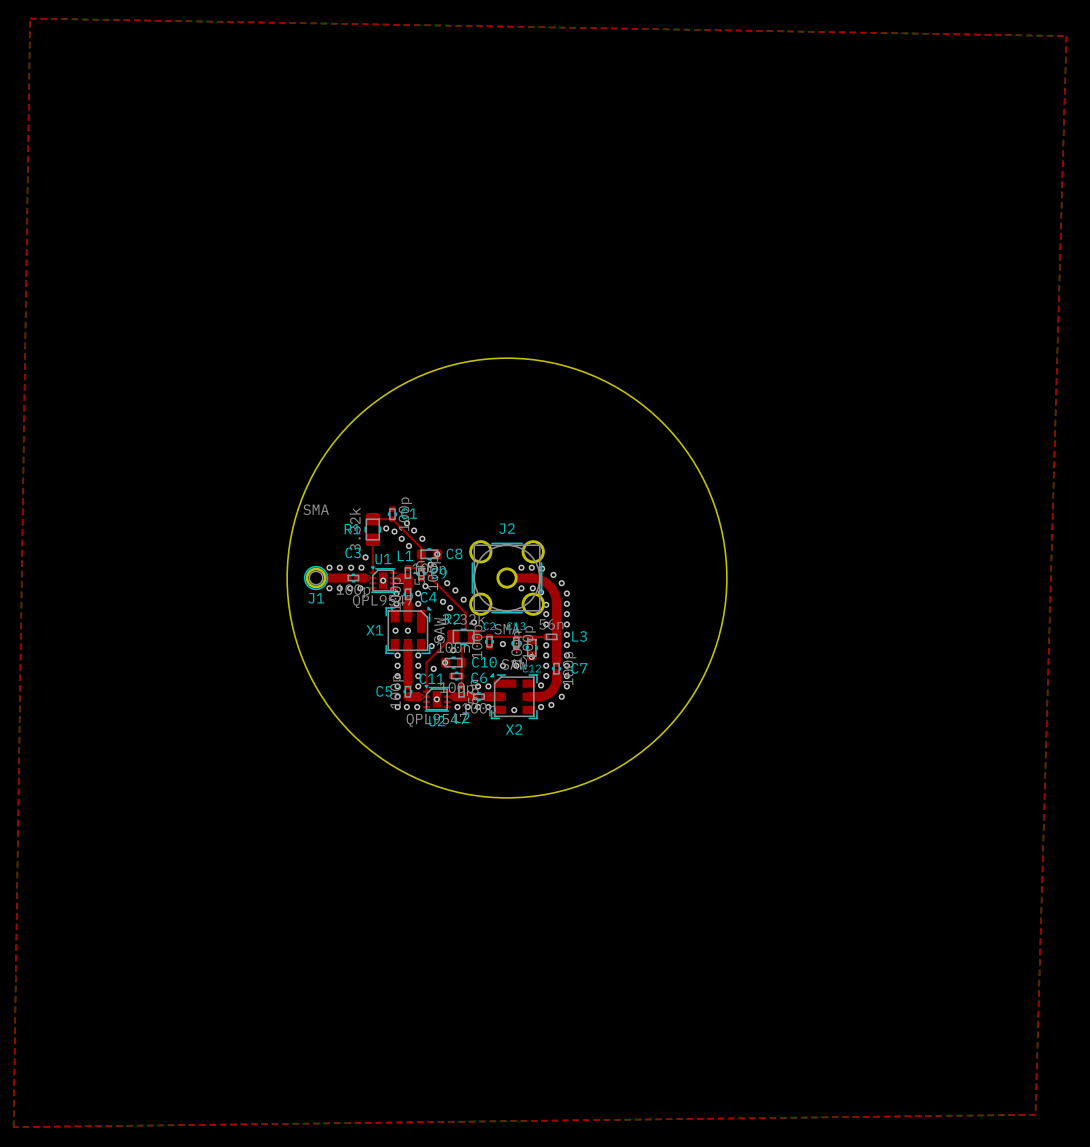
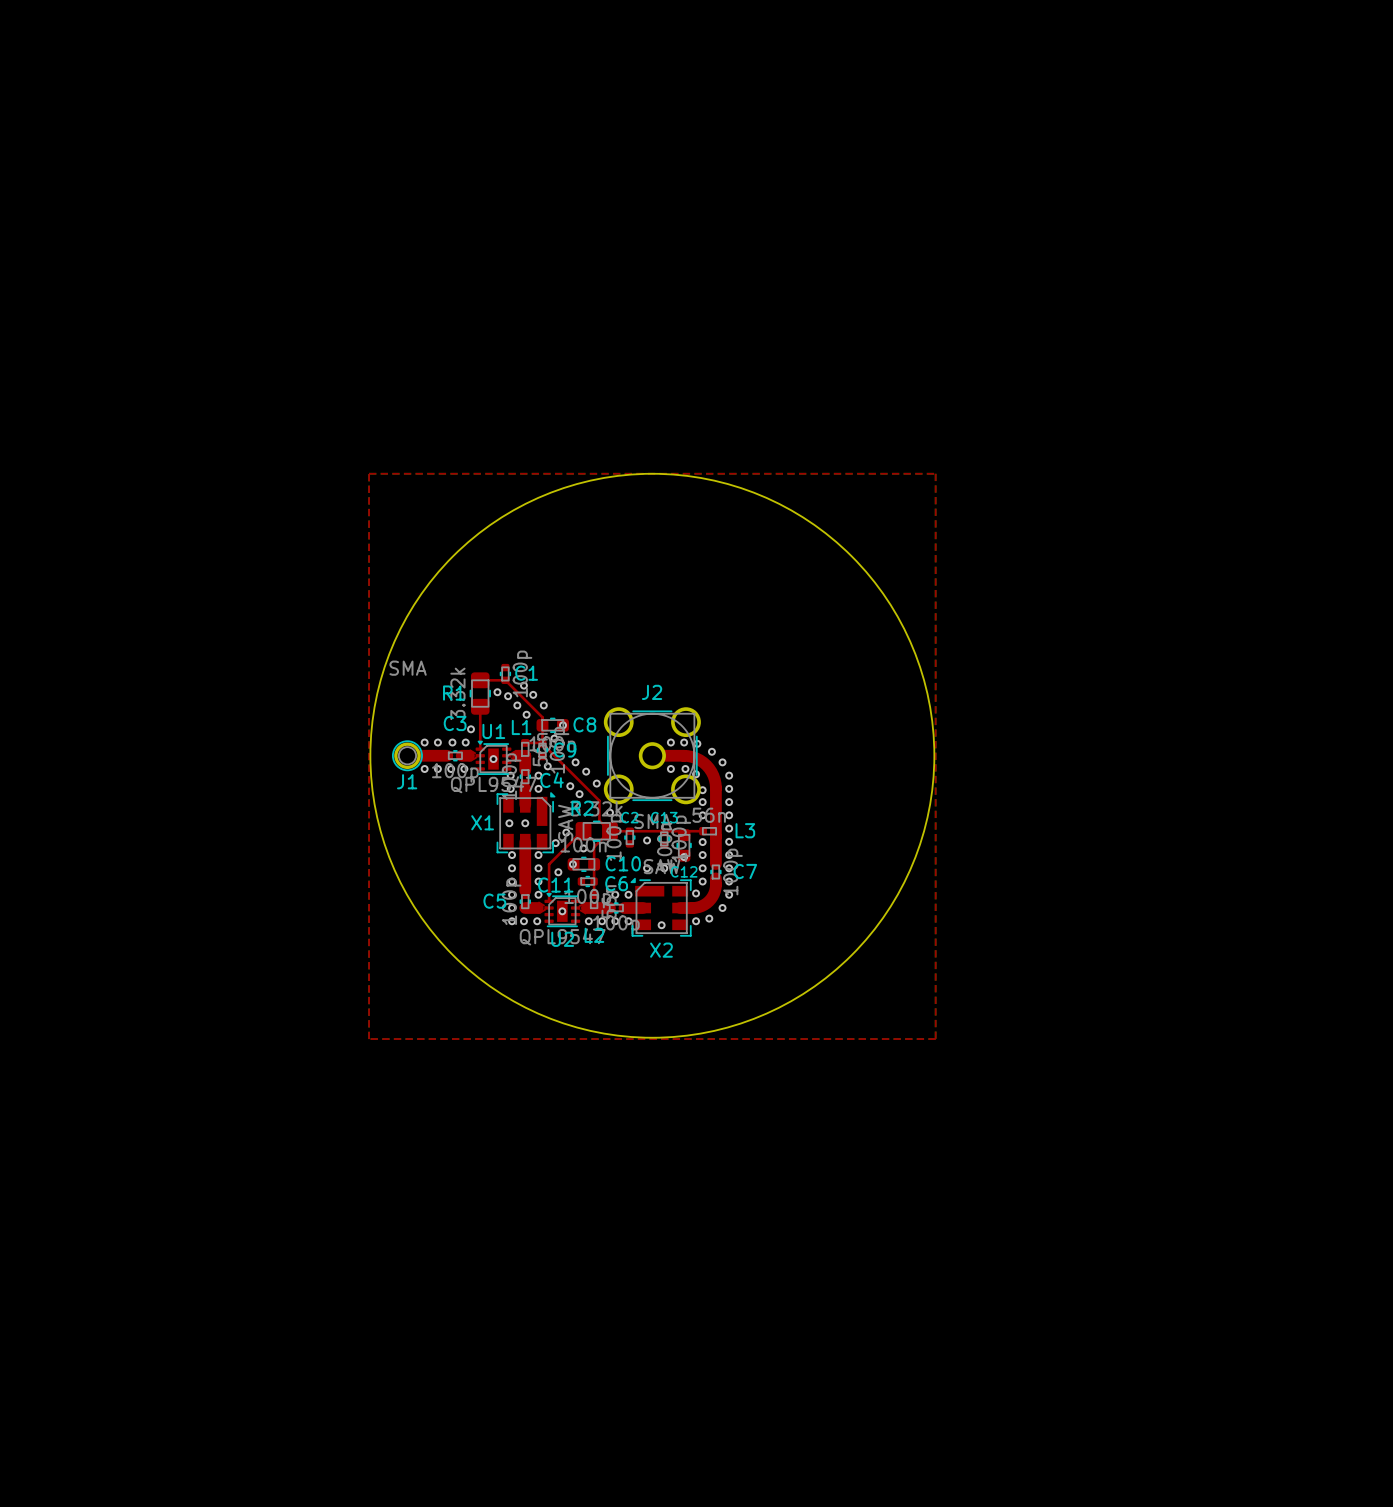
top zone outline: (30, 18) (1066, 36) (1035, 1114) (13, 1127) (30, 18) -> none
top zone outline: none -> (369, 473) (935, 473) (935, 1039) (369, 1039) (369, 473)

